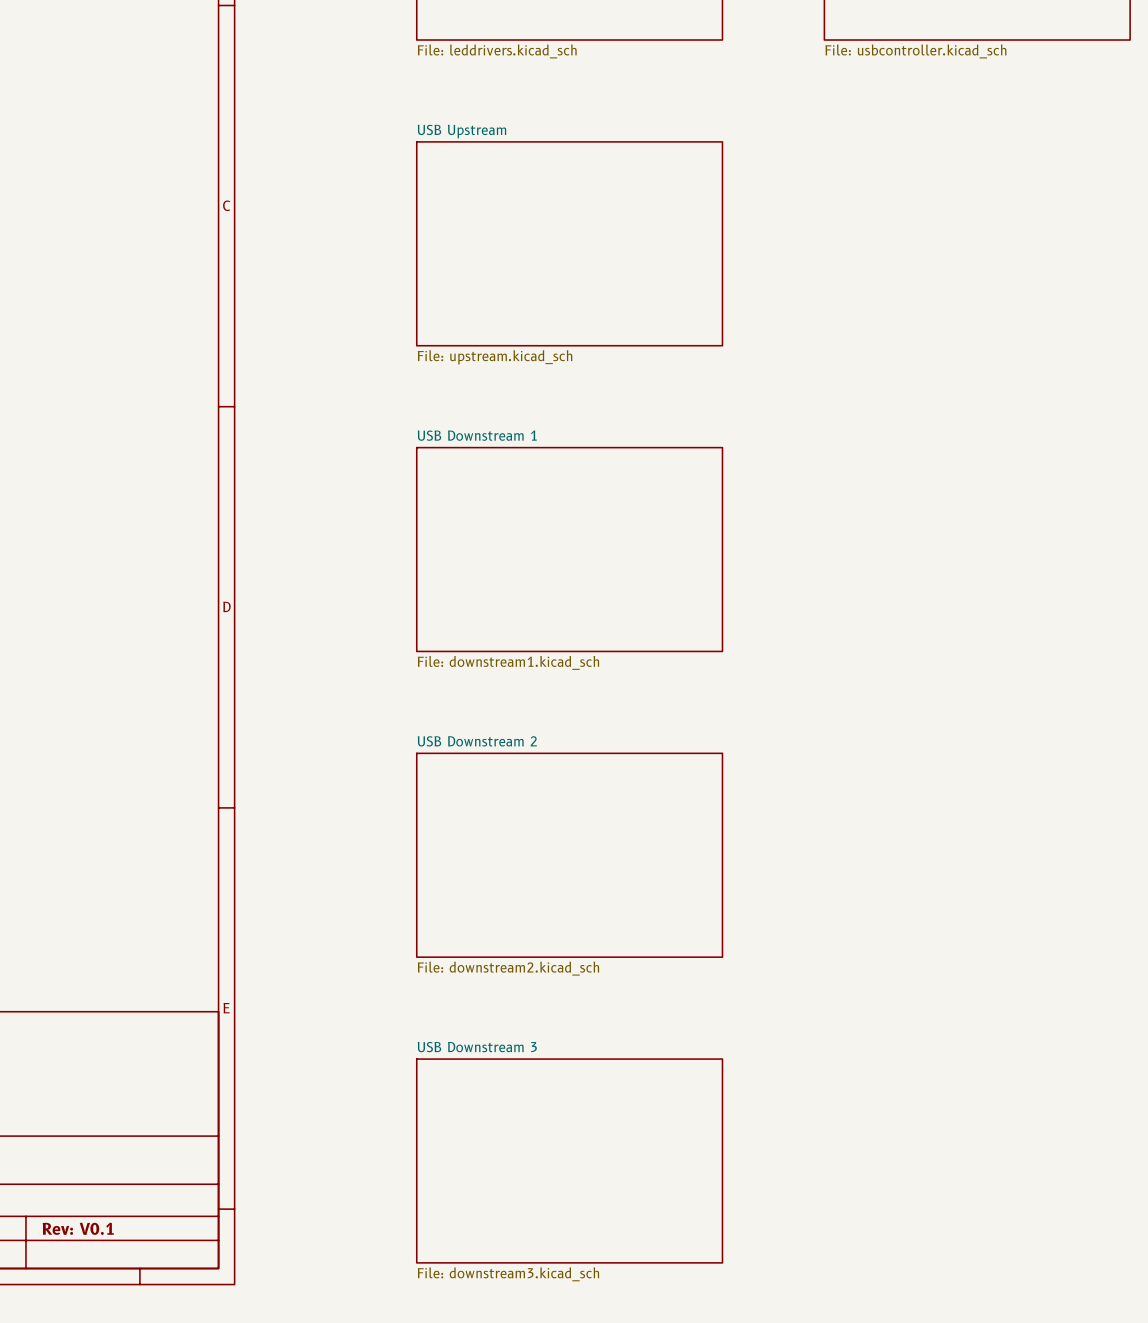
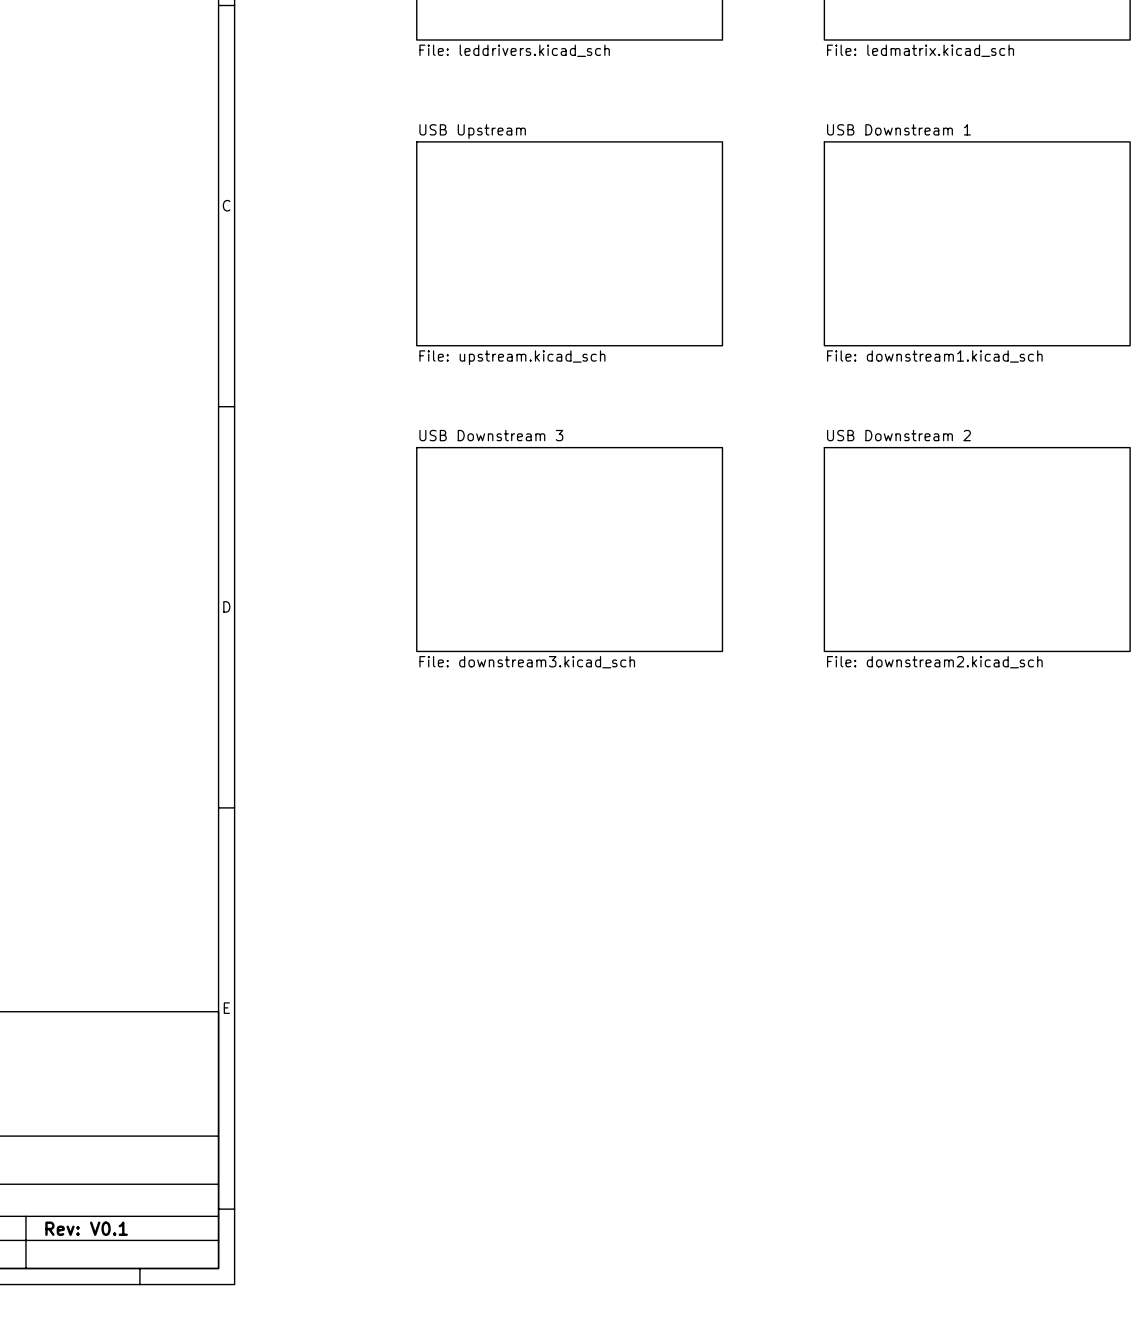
sheet value: File: usbcontroller.kicad_sch (915, 51) -> File: ledmatrix.kicad_sch (920, 50)
sheet USB Downstream 1: none -> File: downstream1.kicad_sch (977, 243)
sheet USB Downstream 1 name: USB Downstream 1 (477, 435) -> USB Downstream 3 (491, 435)
sheet USB Downstream 1 value: File: downstream1.kicad_sch (508, 662) -> File: downstream3.kicad_sch (527, 662)
sheet USB Downstream 2 position: (569, 855) -> (977, 549)
sheet USB Downstream 3: File: downstream3.kicad_sch (569, 1160) -> none

